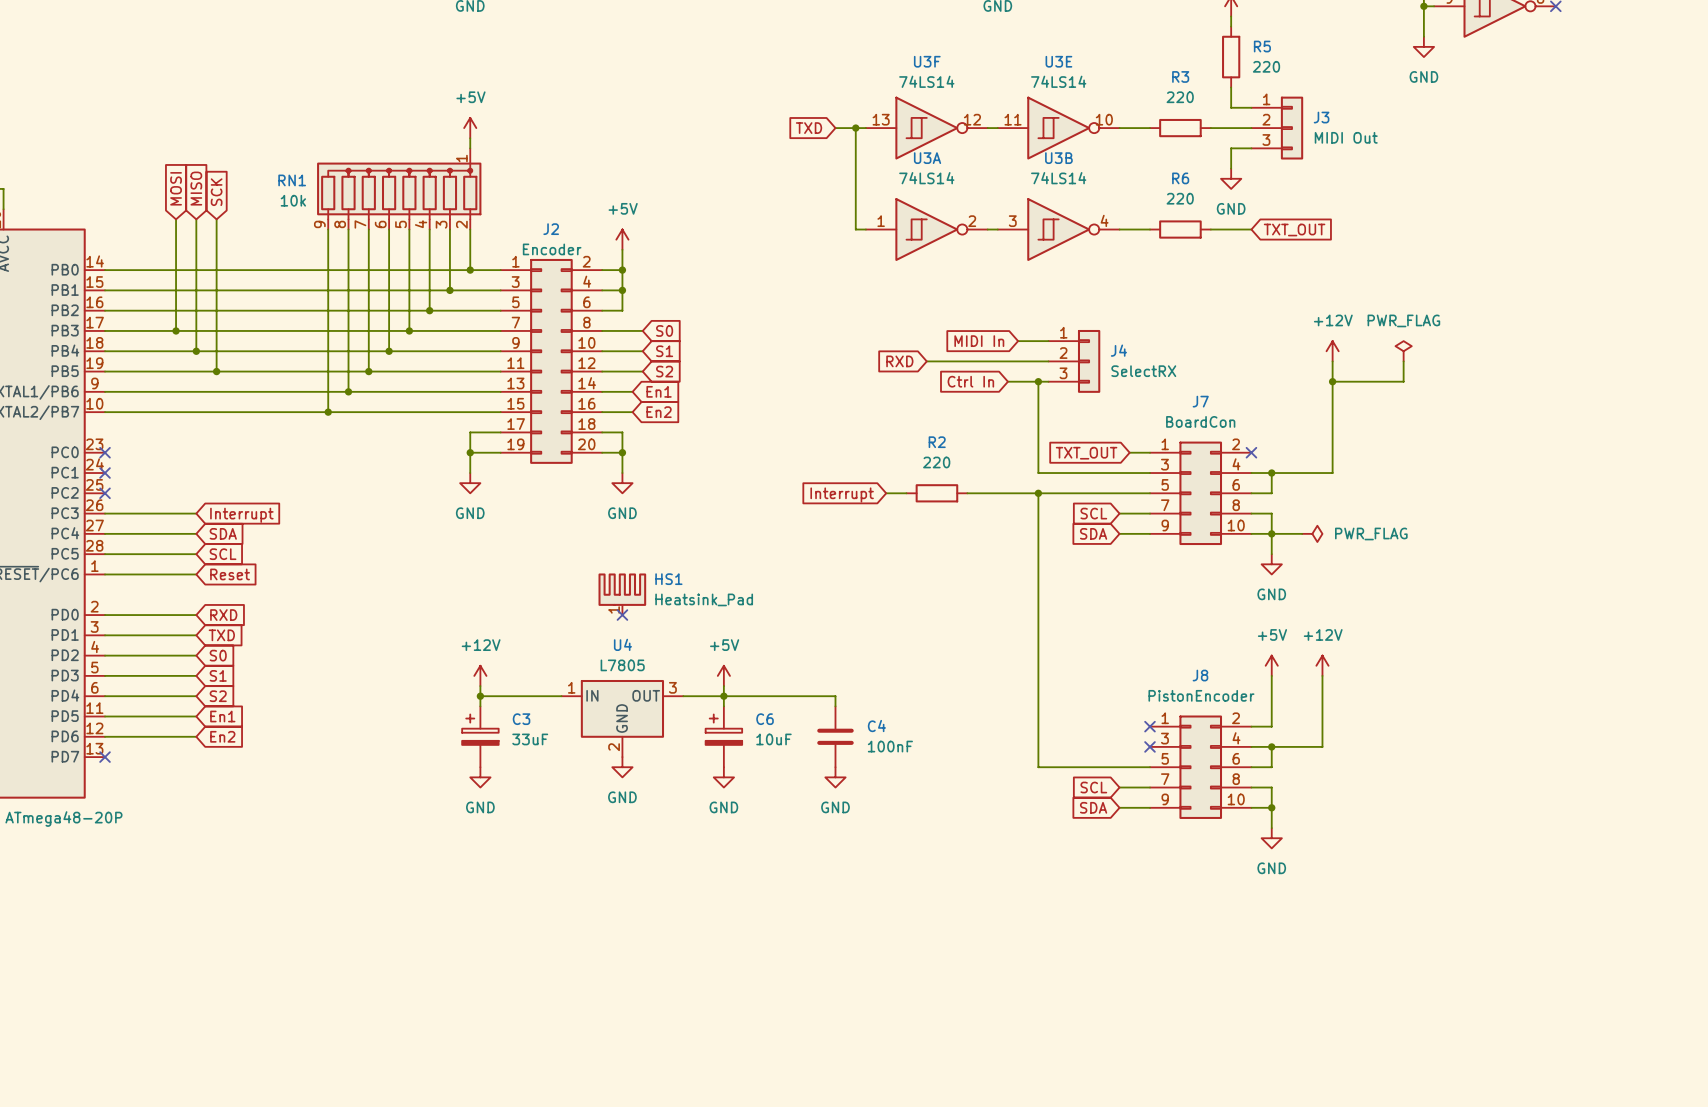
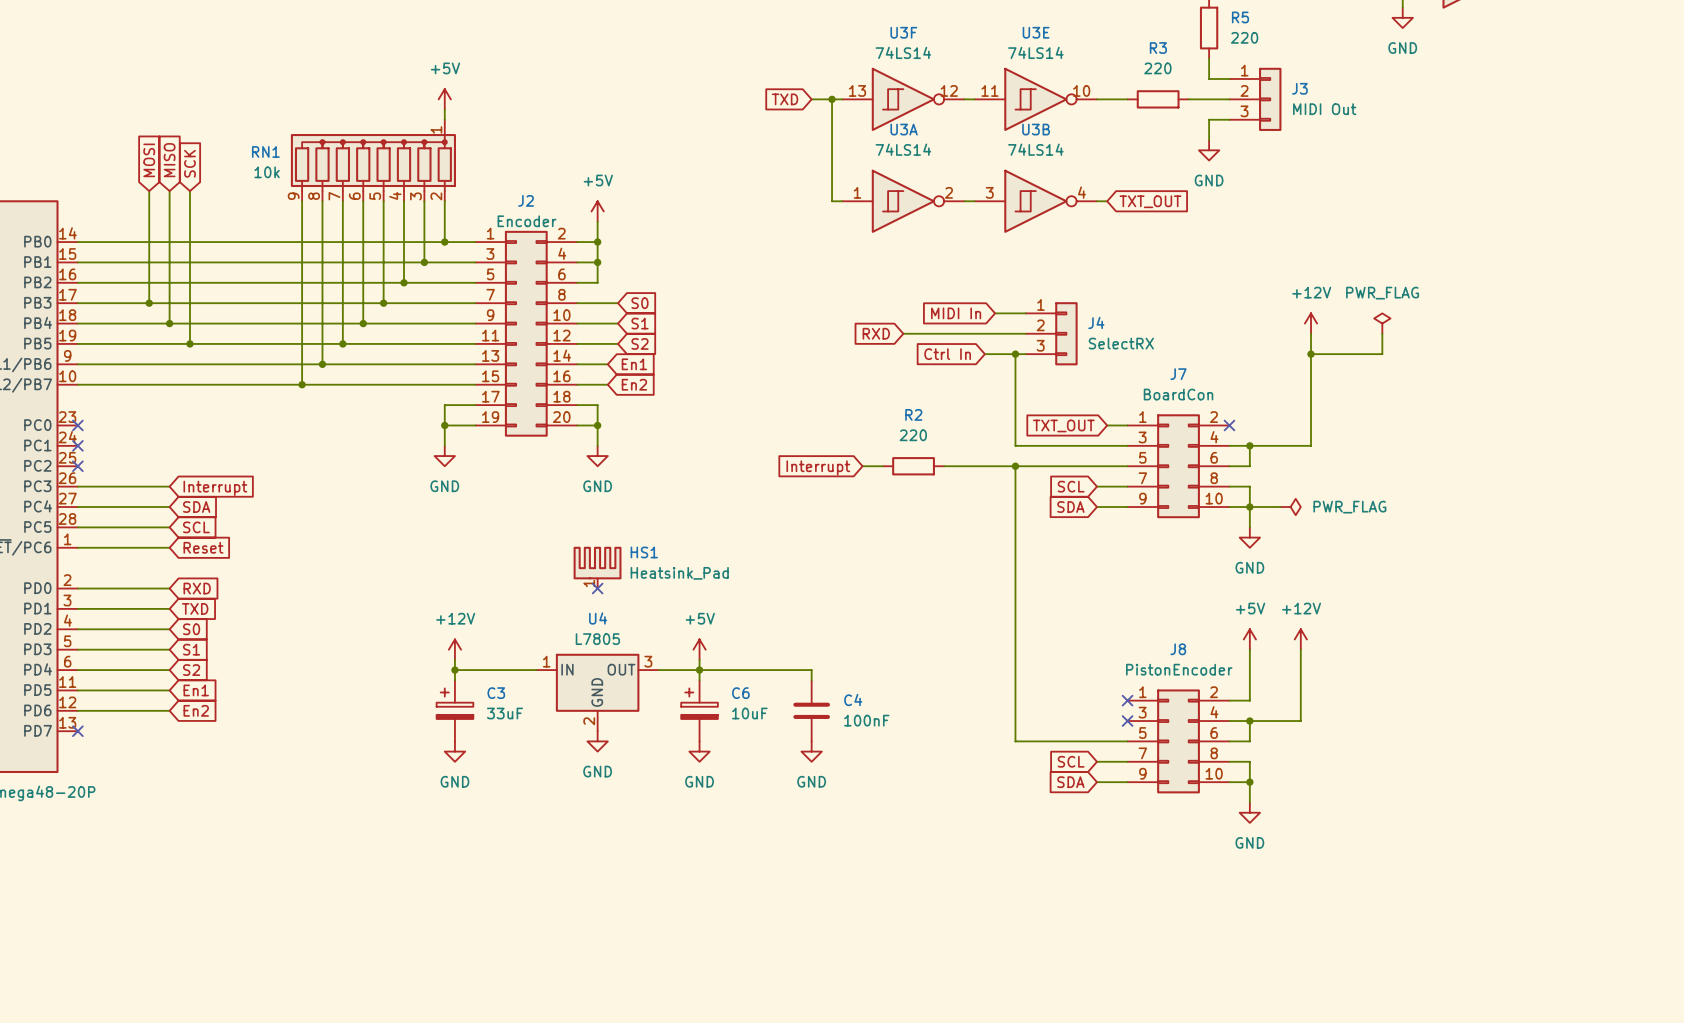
wire: (1129, 229) (1149, 229) -> none
R6: 220 (1180, 229) -> none
wire: (1210, 229) (1251, 229) -> none
global label position: TXT_OUT (1294, 230) -> TXT_OUT (1150, 201)

